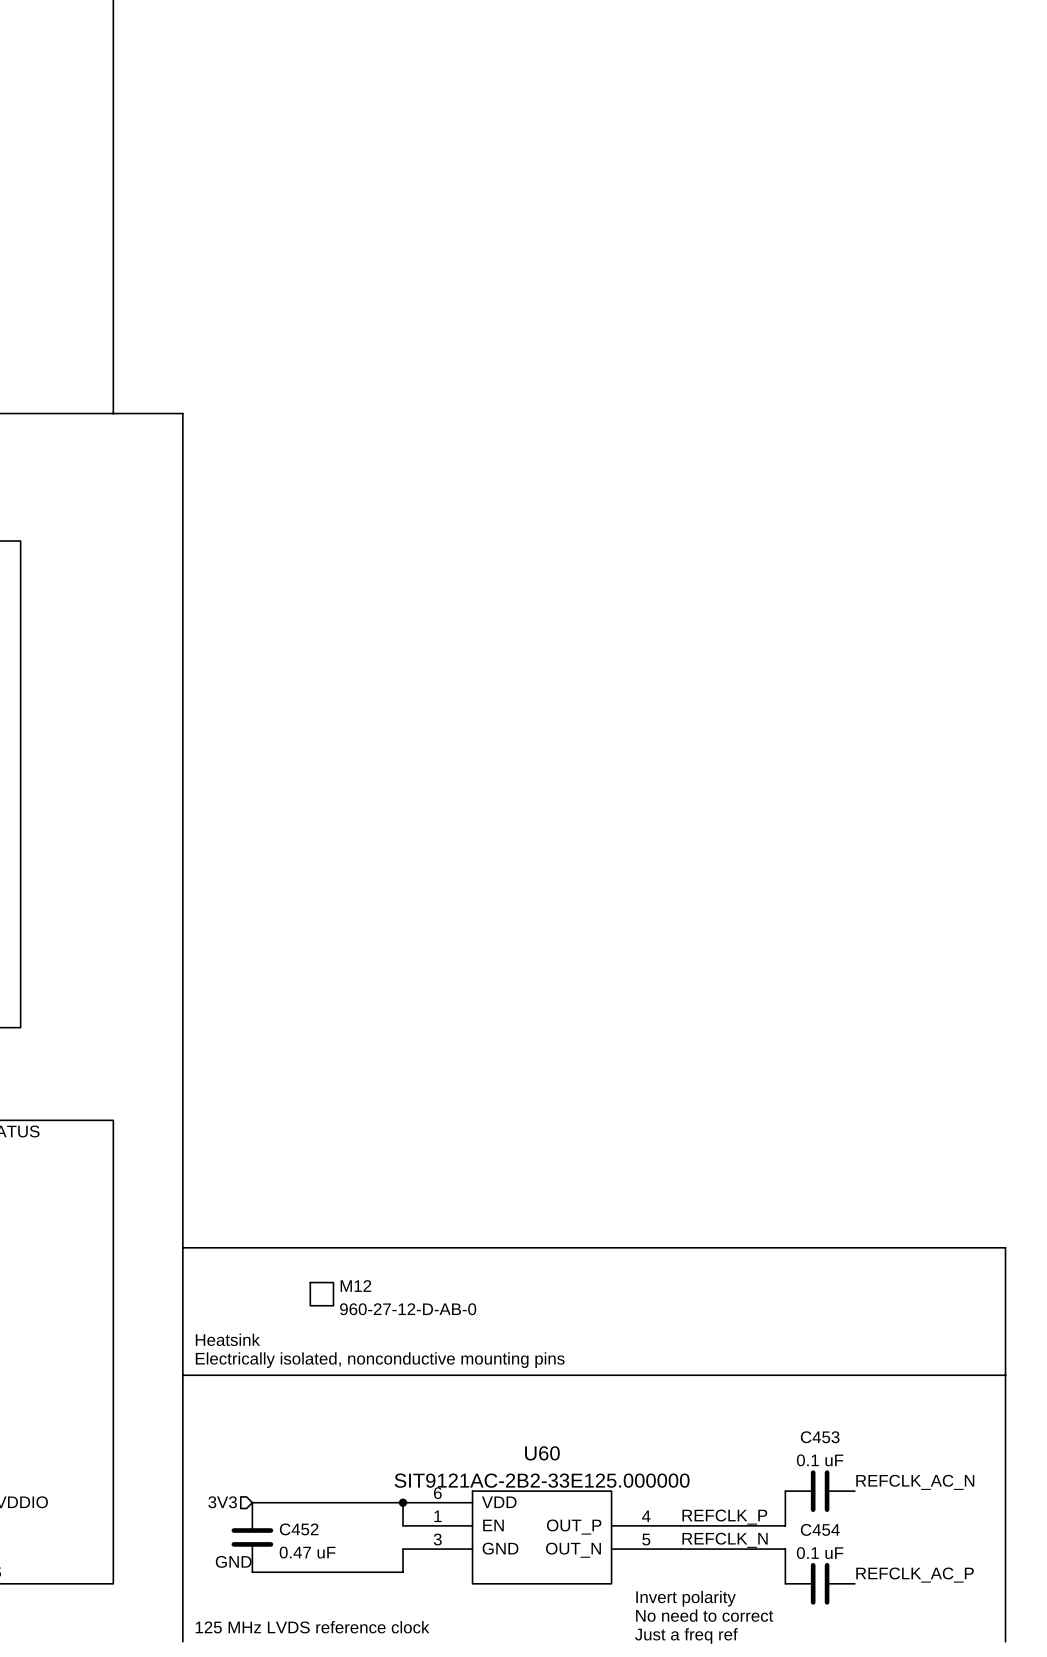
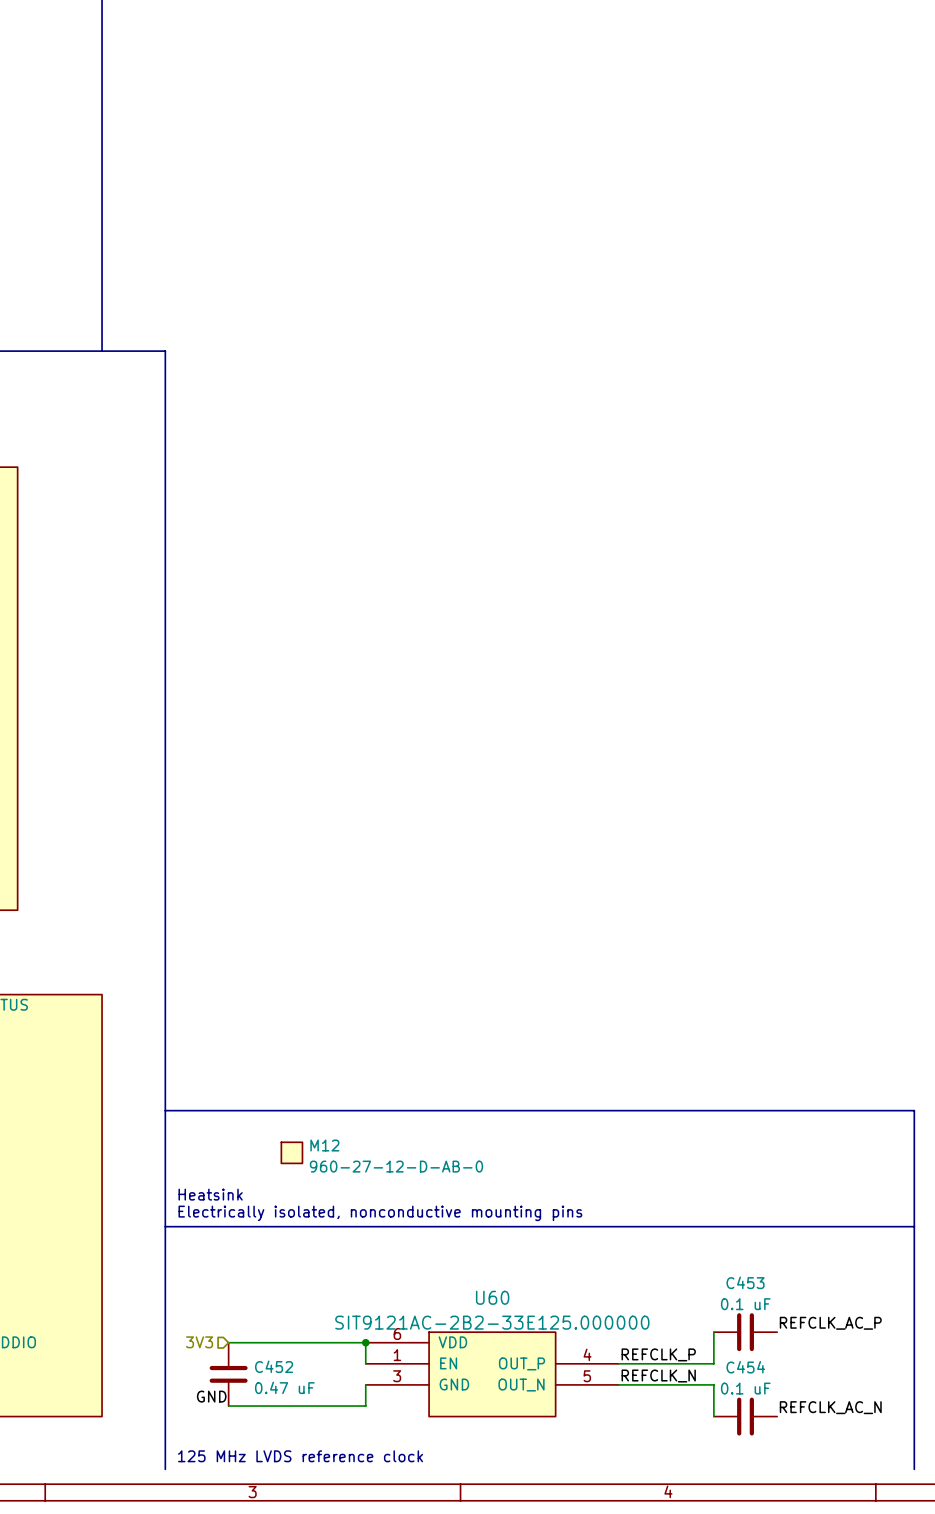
label: REFCLK_AC_N (915, 1482) -> REFCLK_AC_P (830, 1323)
label: REFCLK_AC_P (915, 1575) -> REFCLK_AC_N (830, 1407)
text: Invert polarity (686, 1598) -> none
text: No need to correct (704, 1615) -> none
text: Just a freq ref (686, 1635) -> none

